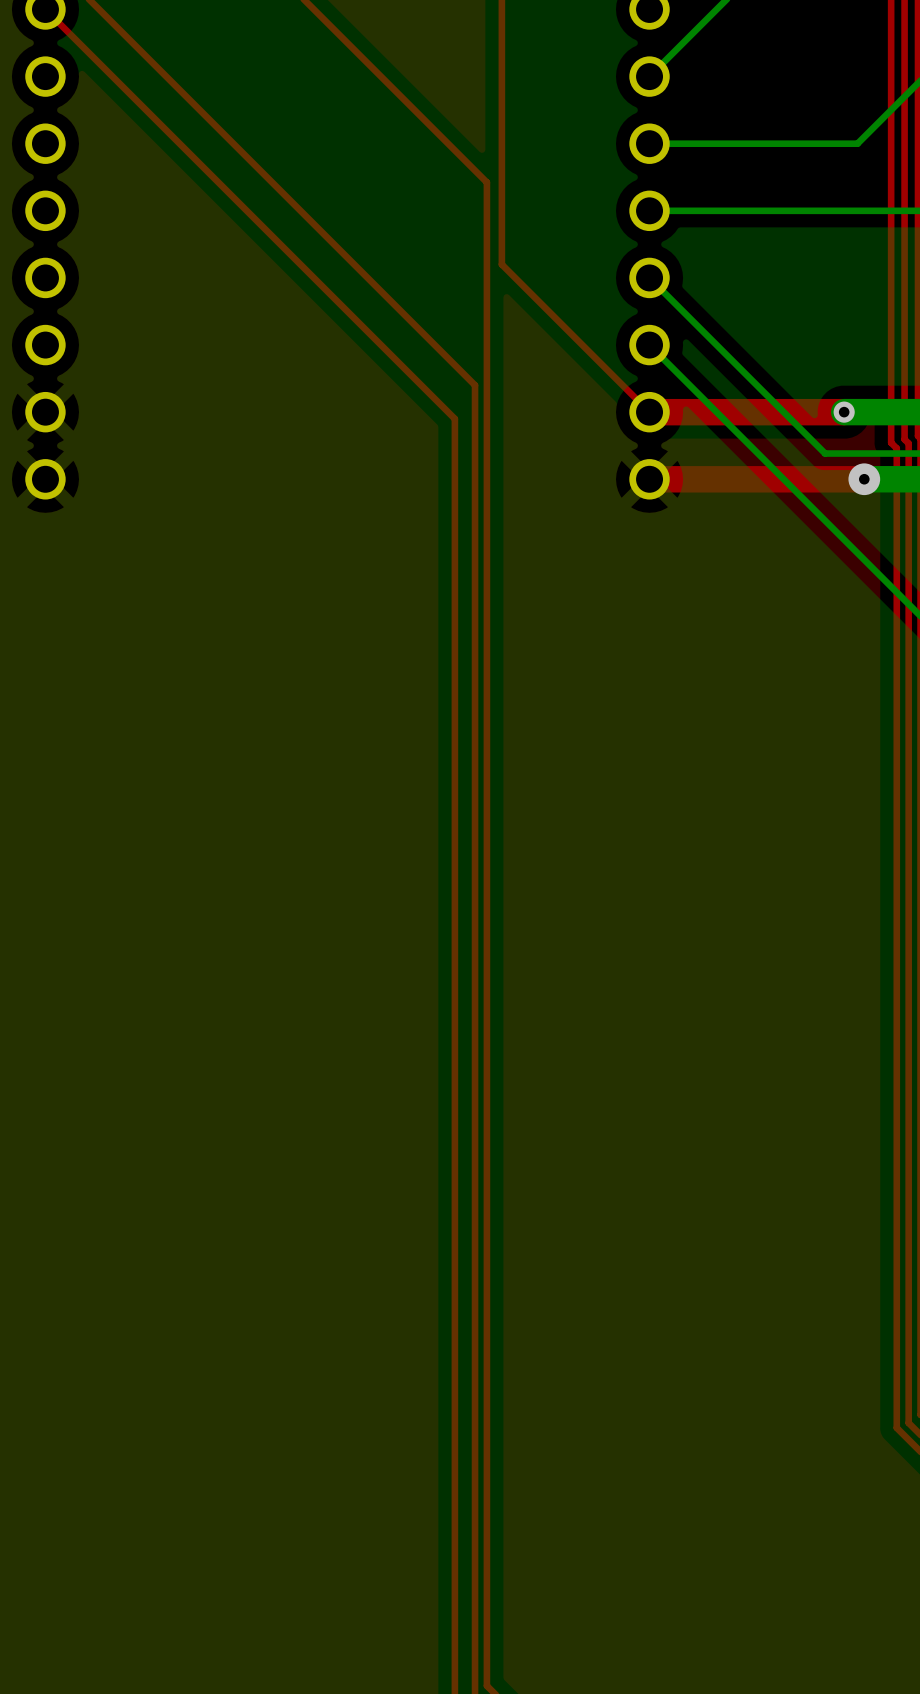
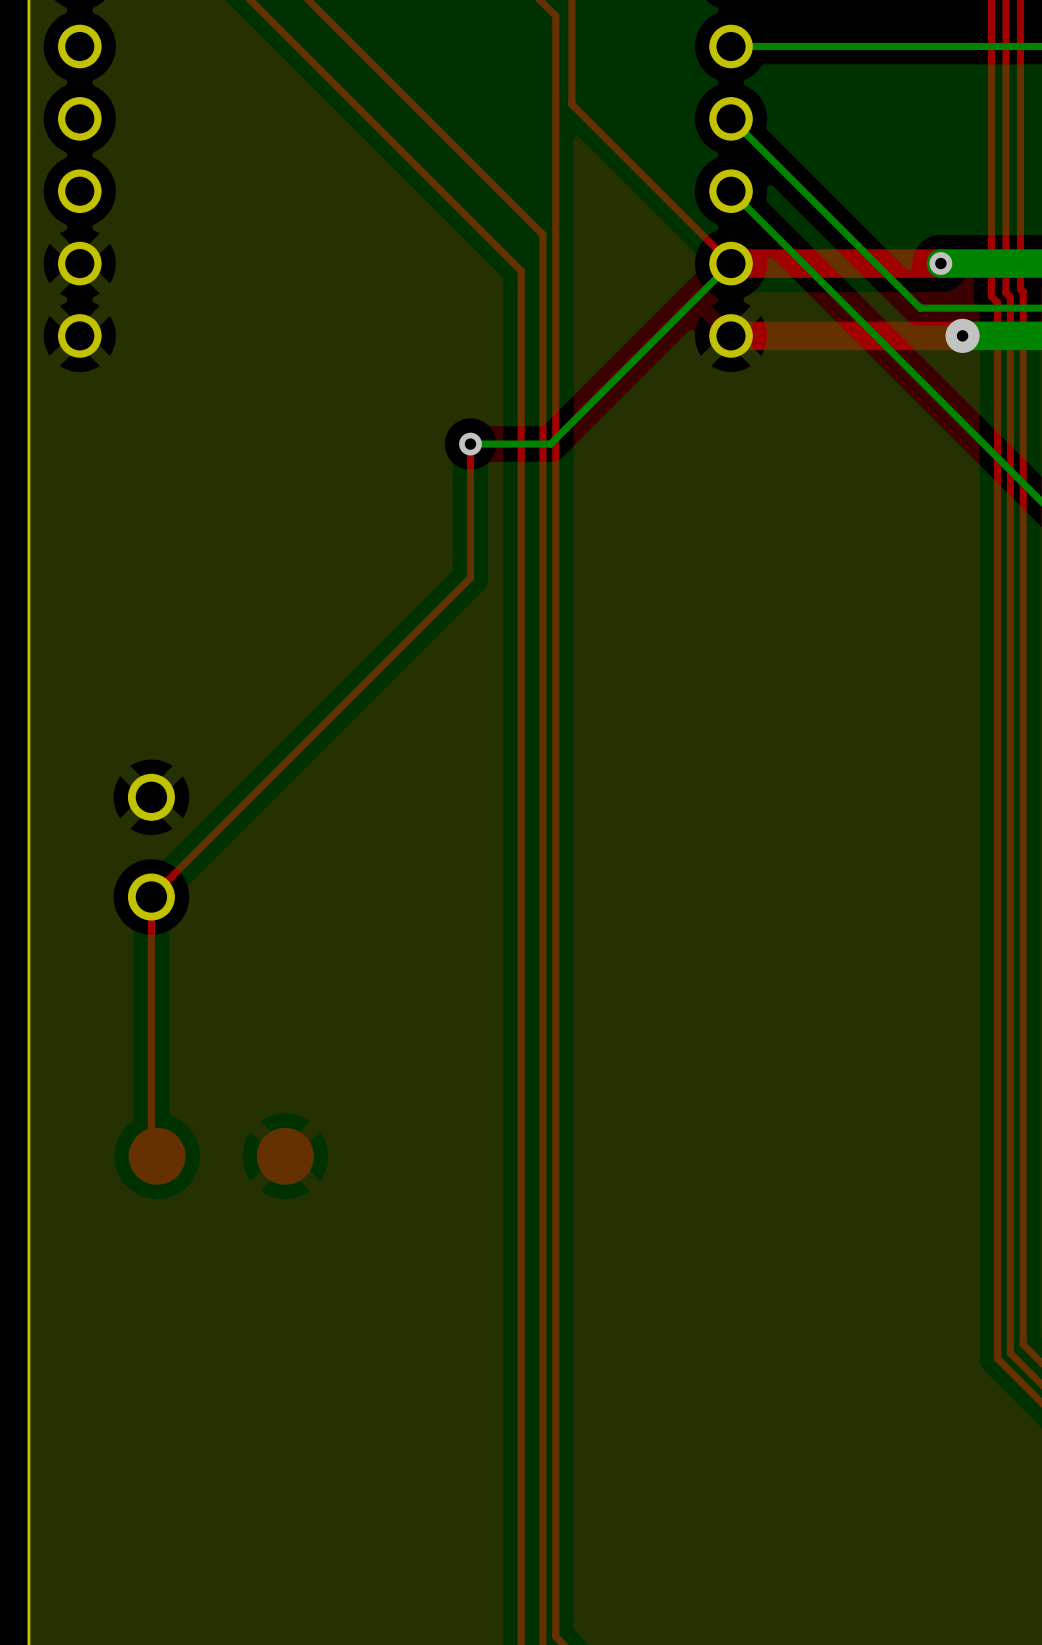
bottom track: none -> (731, 263) (550, 444) (470, 444)
top track: none -> (470, 444) (470, 577) (151, 897) (151, 1136) (157, 1142) (157, 1156)
via: none -> (470, 444)
part: none -> (151, 847)
part: none -> (157, 1156)
part: none -> (285, 1156)

